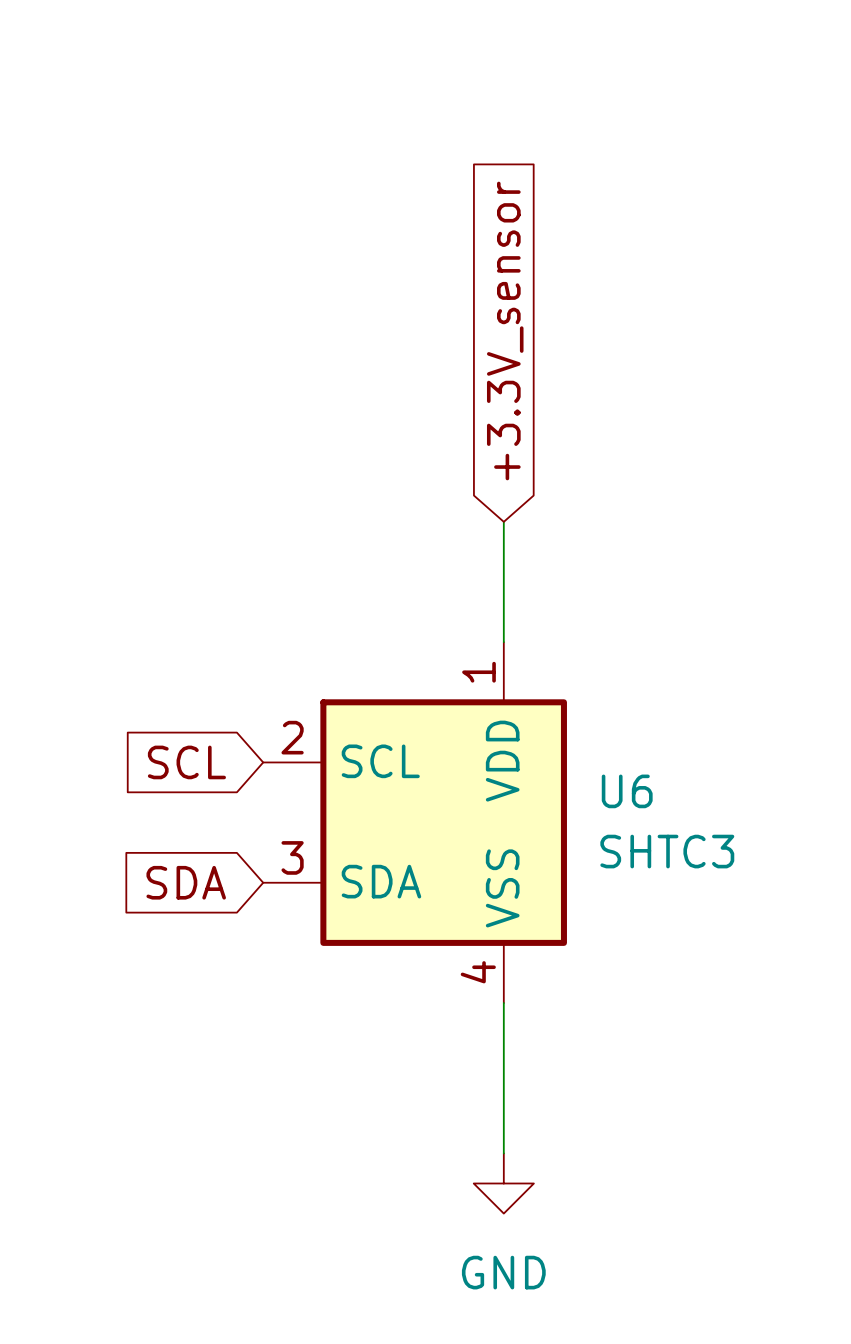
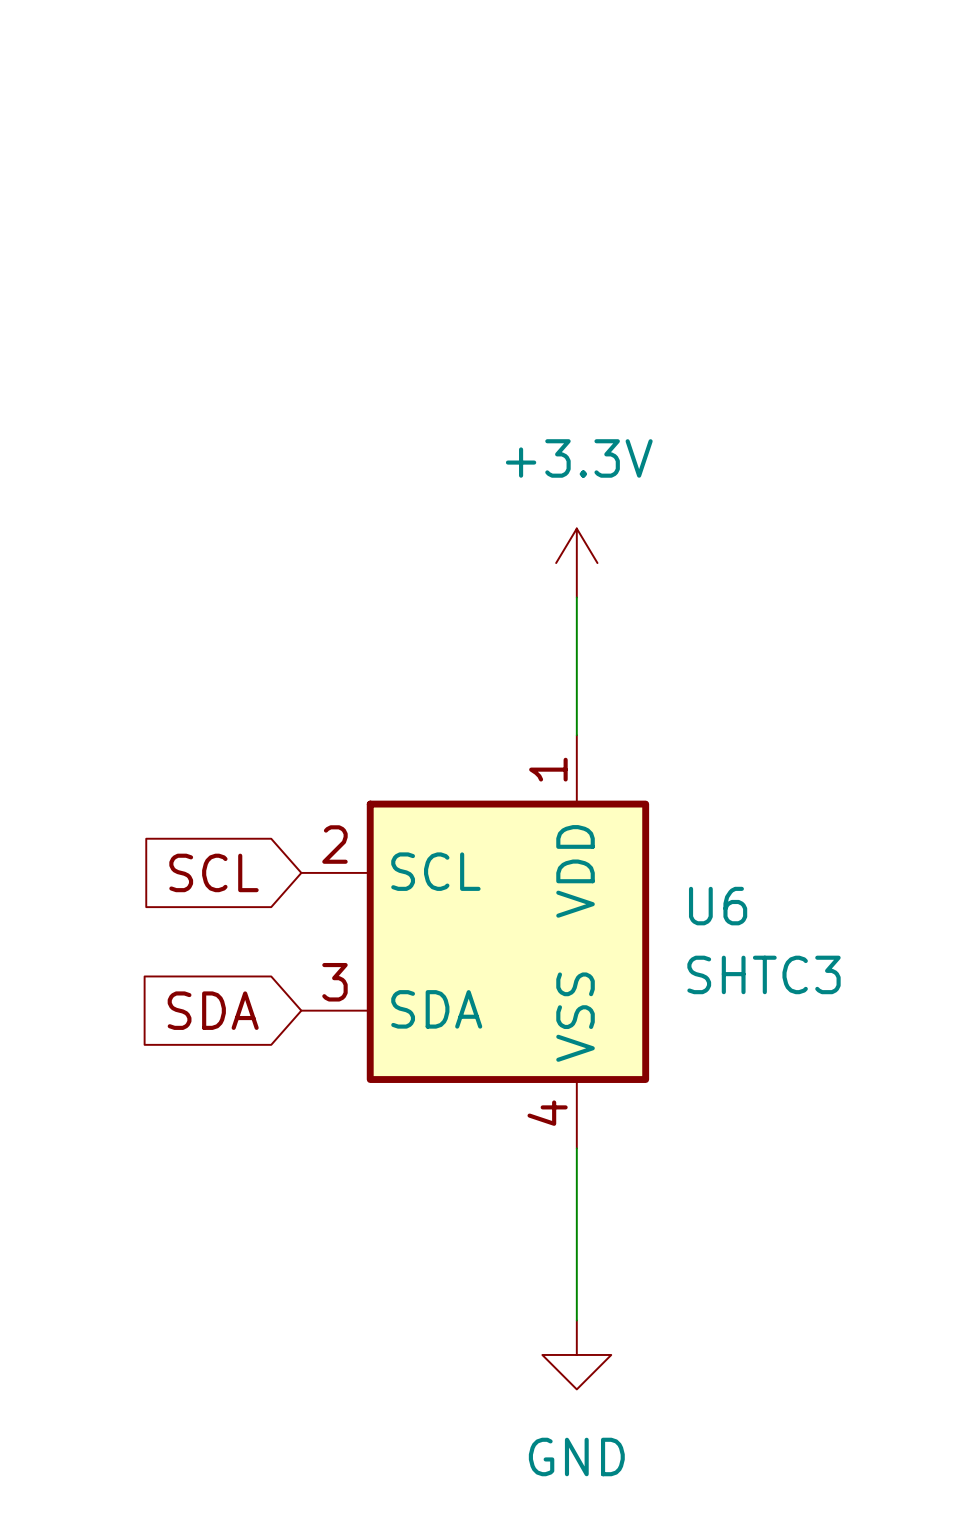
global label: +3.3V_sensor (505, 330) -> none
power symbol: none -> +3.3V (576, 563)

